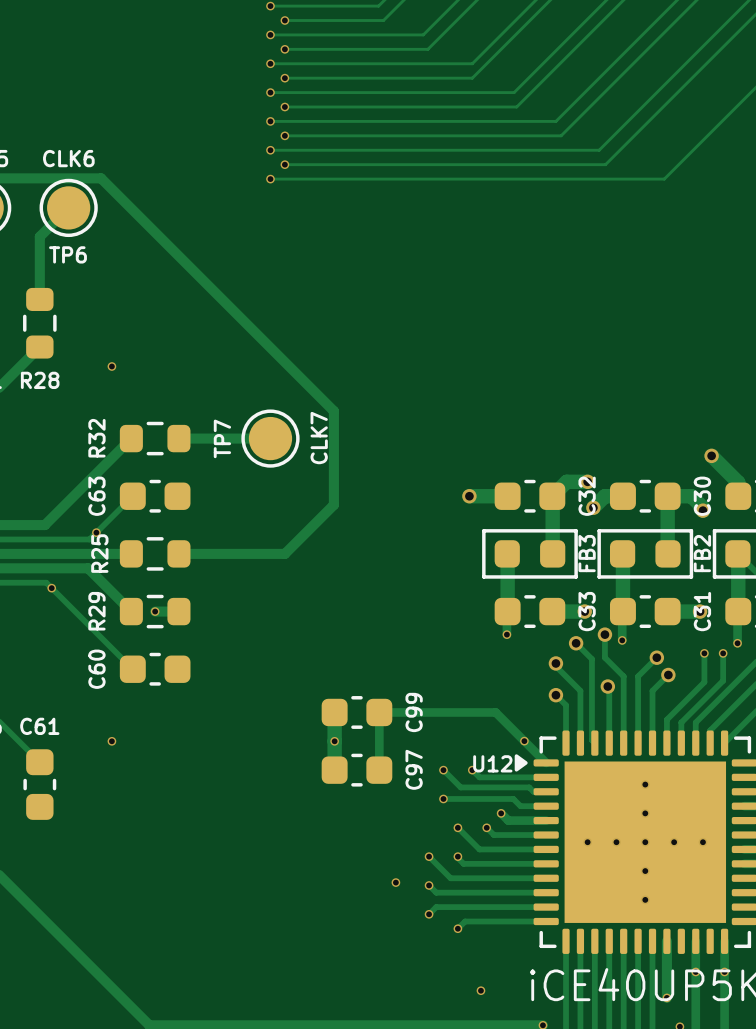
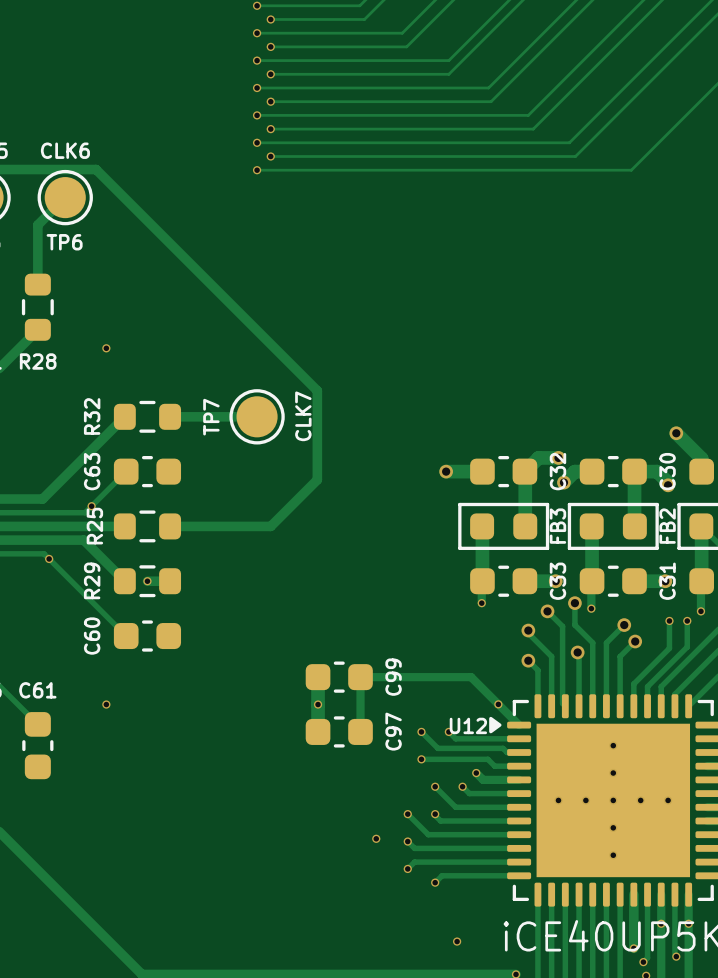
track: none -> (647, 894) (647, 958) (643, 962)
track: none -> (674, 894) (676, 956)
via: none -> (676, 956)
via: none -> (643, 962)

